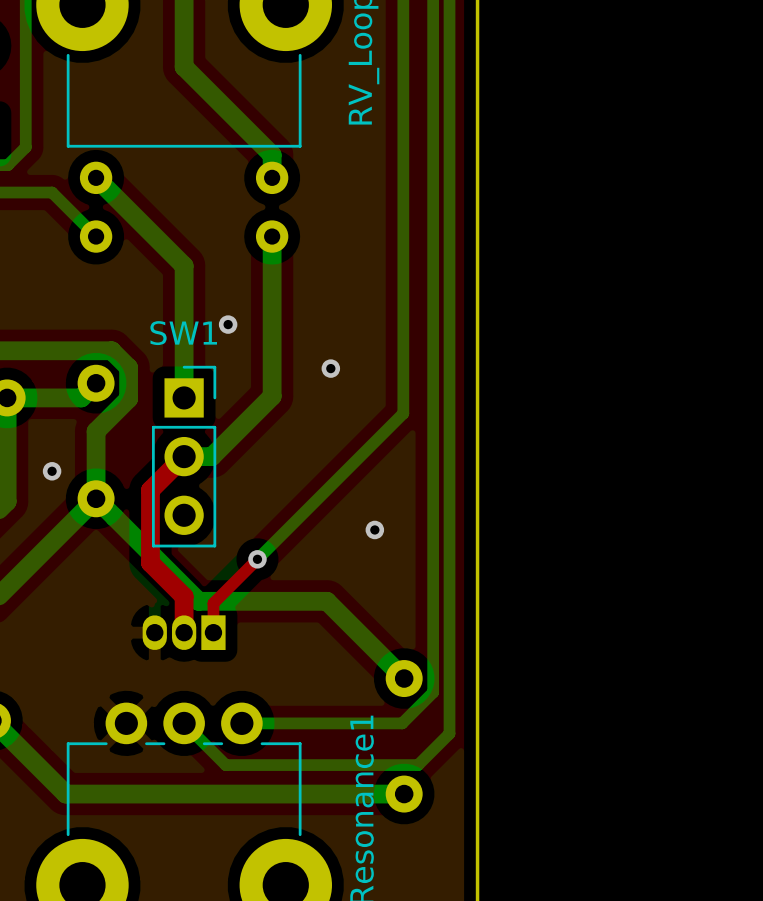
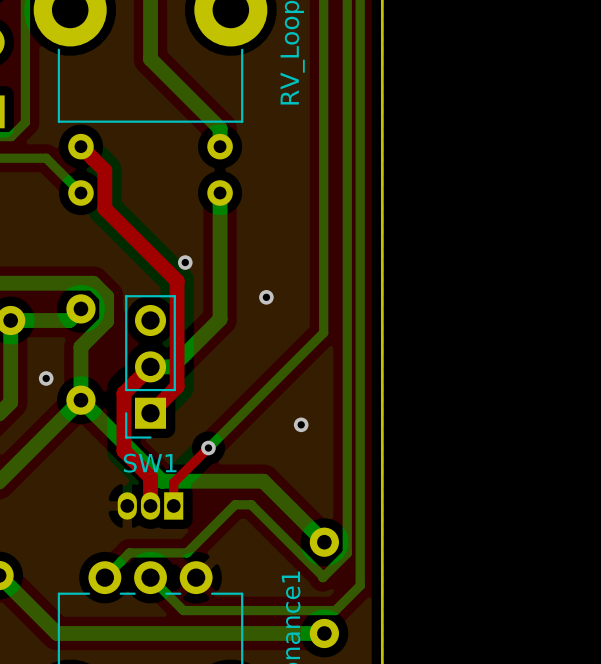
bottom track: (96, 177) (184, 265) (184, 397) -> none
top track: none -> (80, 146) (104, 170) (104, 208) (177, 280) (177, 386) (150, 413)
SW1 rotation: 0° (184, 456) -> 180° (150, 366)
bottom track: (241, 723) (402, 723) -> (104, 577) (129, 552) (187, 552) (235, 504) (251, 504) (322, 577)

